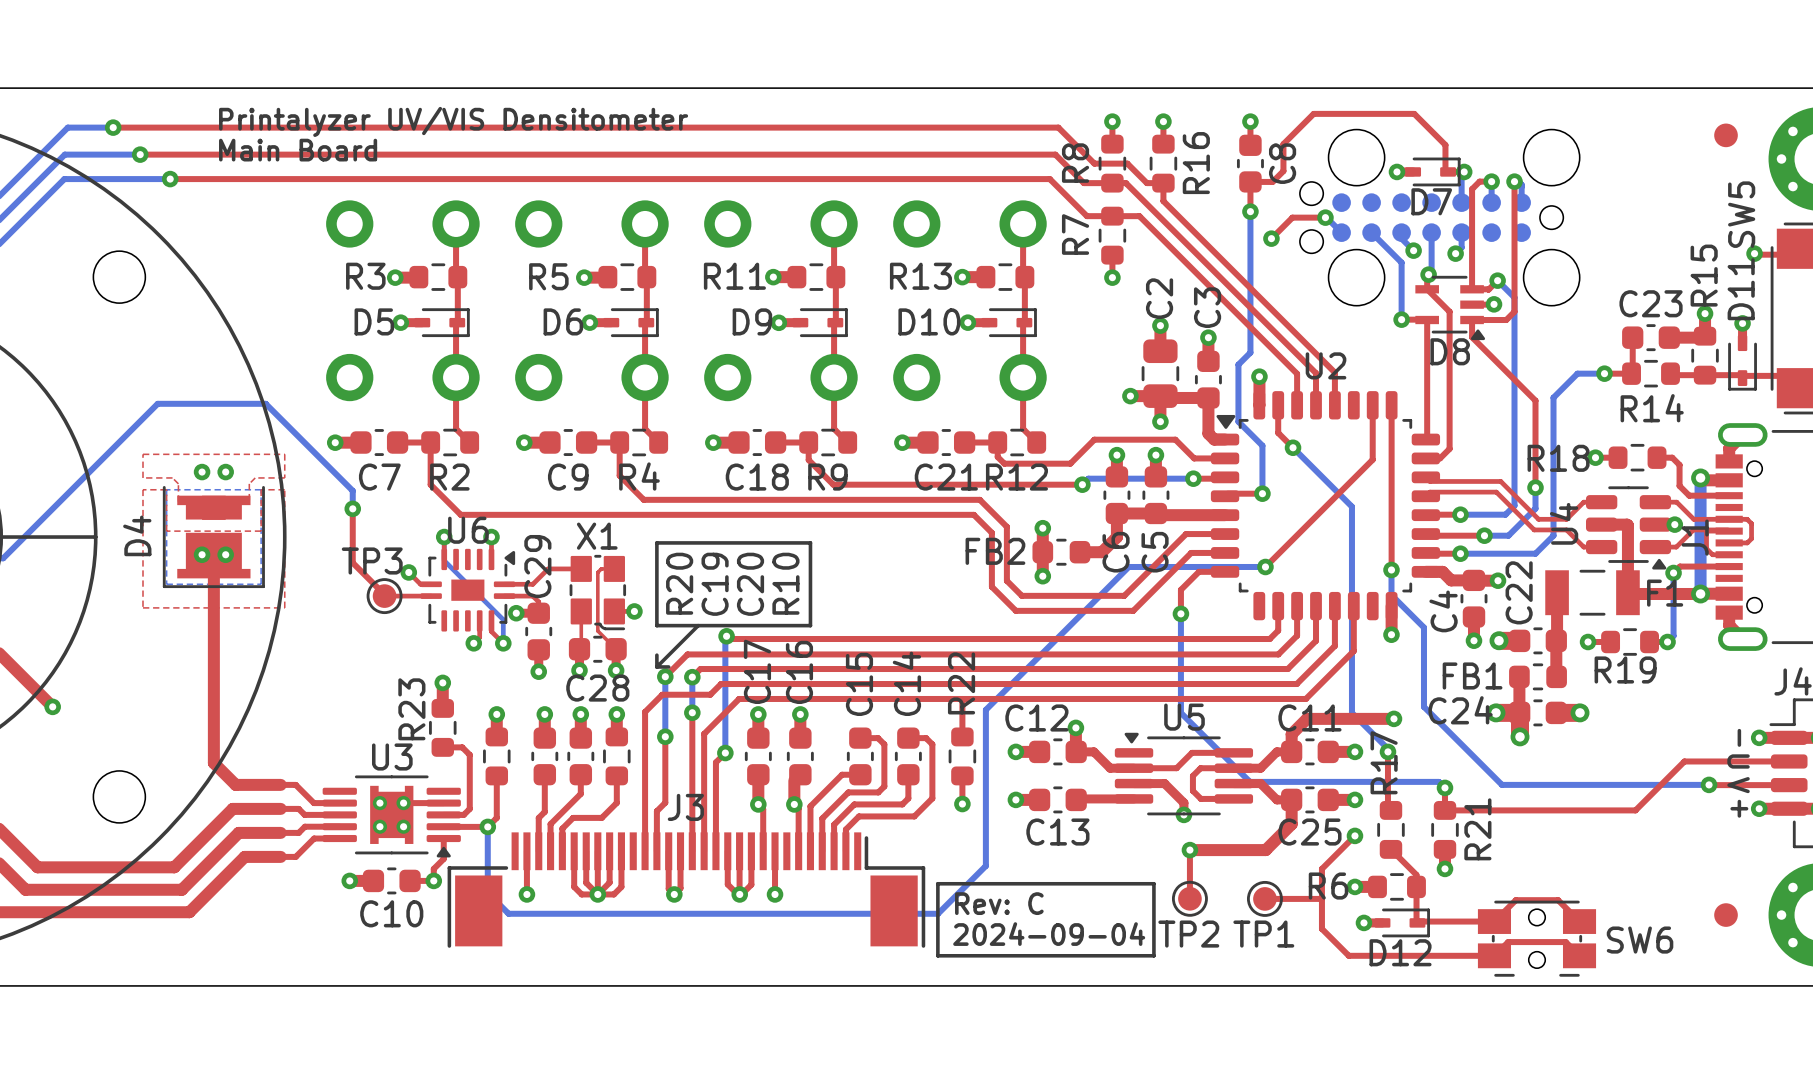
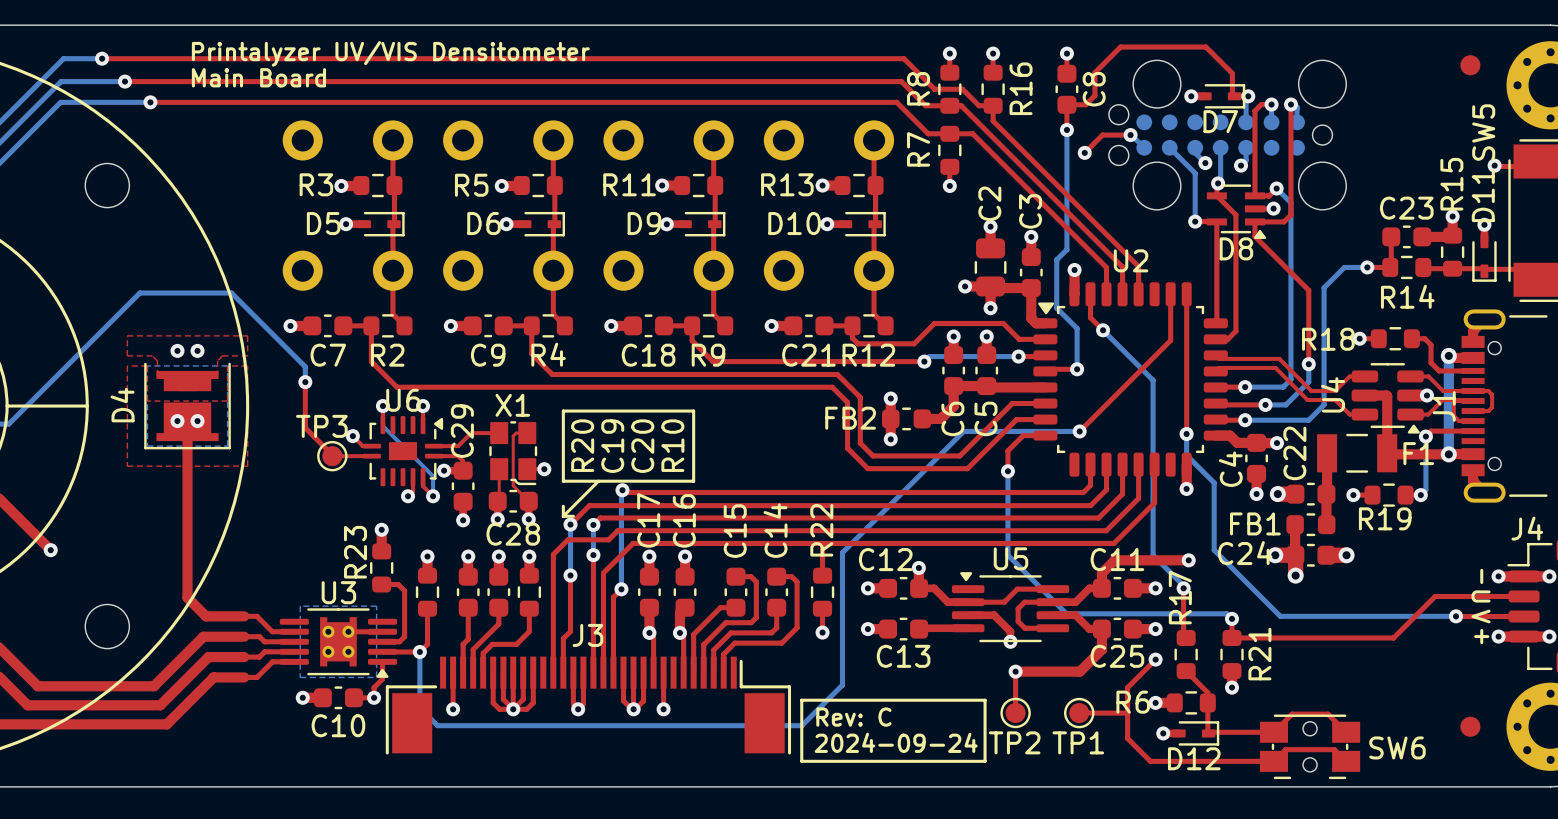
bottom zone outline: none -> (300, 606) (300, 677) (376, 677) (376, 606) (300, 606)
text: 2024-09-04 (1049, 934) -> 2024-09-24 (896, 742)

